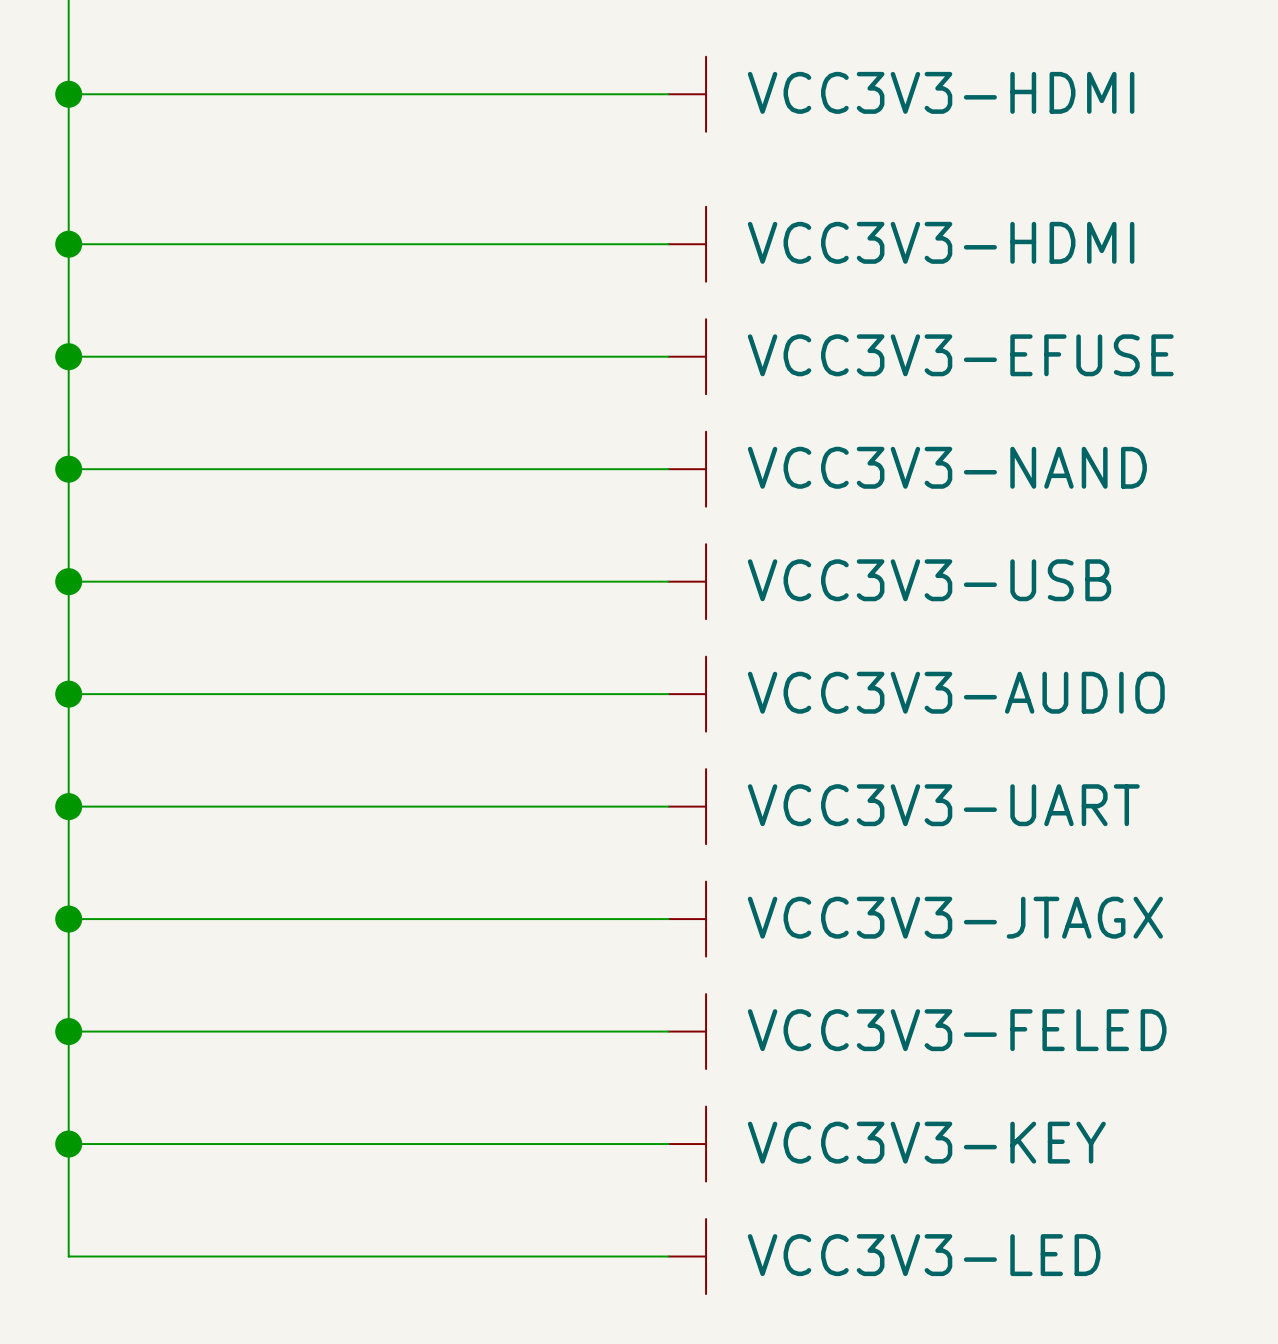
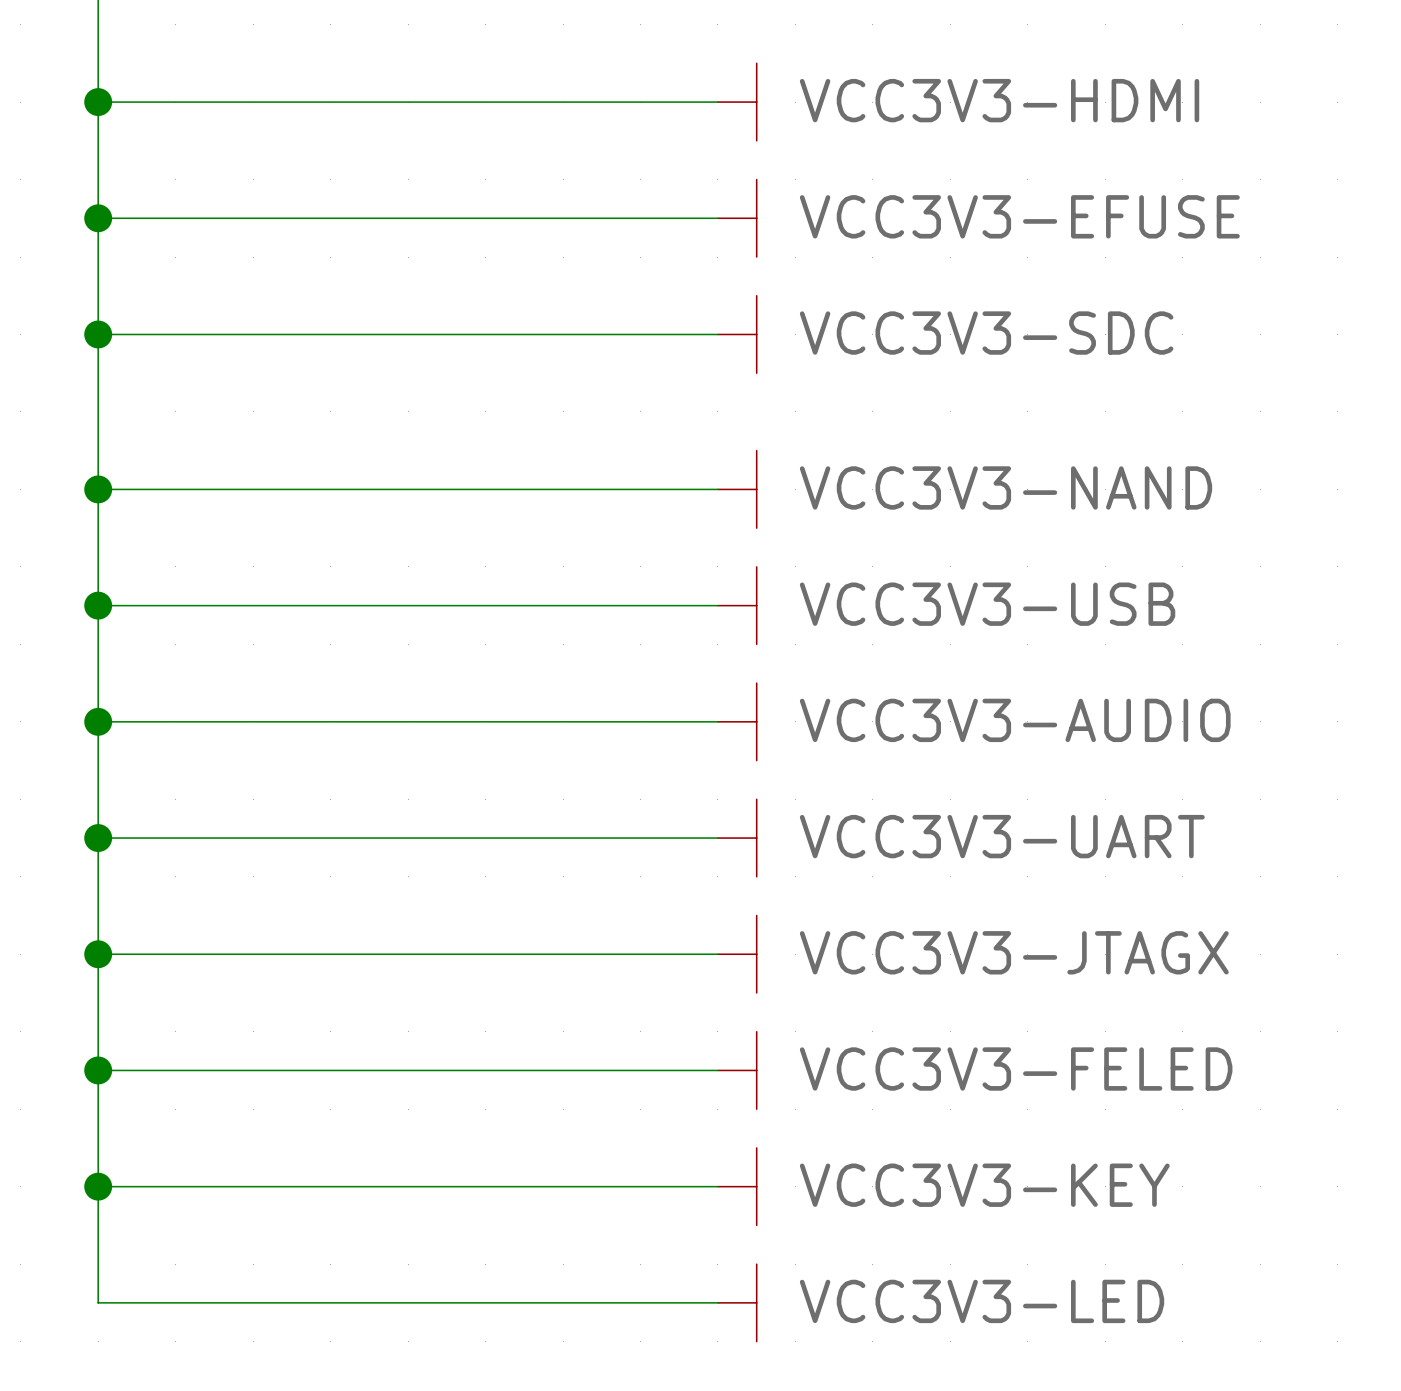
junction: none -> (98, 218)
wire: (68, 244) (668, 244) -> (98, 218) (717, 218)
junction: (68, 244) -> none
power symbol: VCC3V3-HDMI (687, 244) -> none
junction: none -> (98, 334)
power symbol: none -> VCC3V3-SDC (737, 334)
wire: (68, 356) (668, 356) -> (98, 334) (717, 334)
junction: (68, 356) -> none
power symbol position: VCC3V3-EFUSE (687, 356) -> VCC3V3-EFUSE (737, 218)

